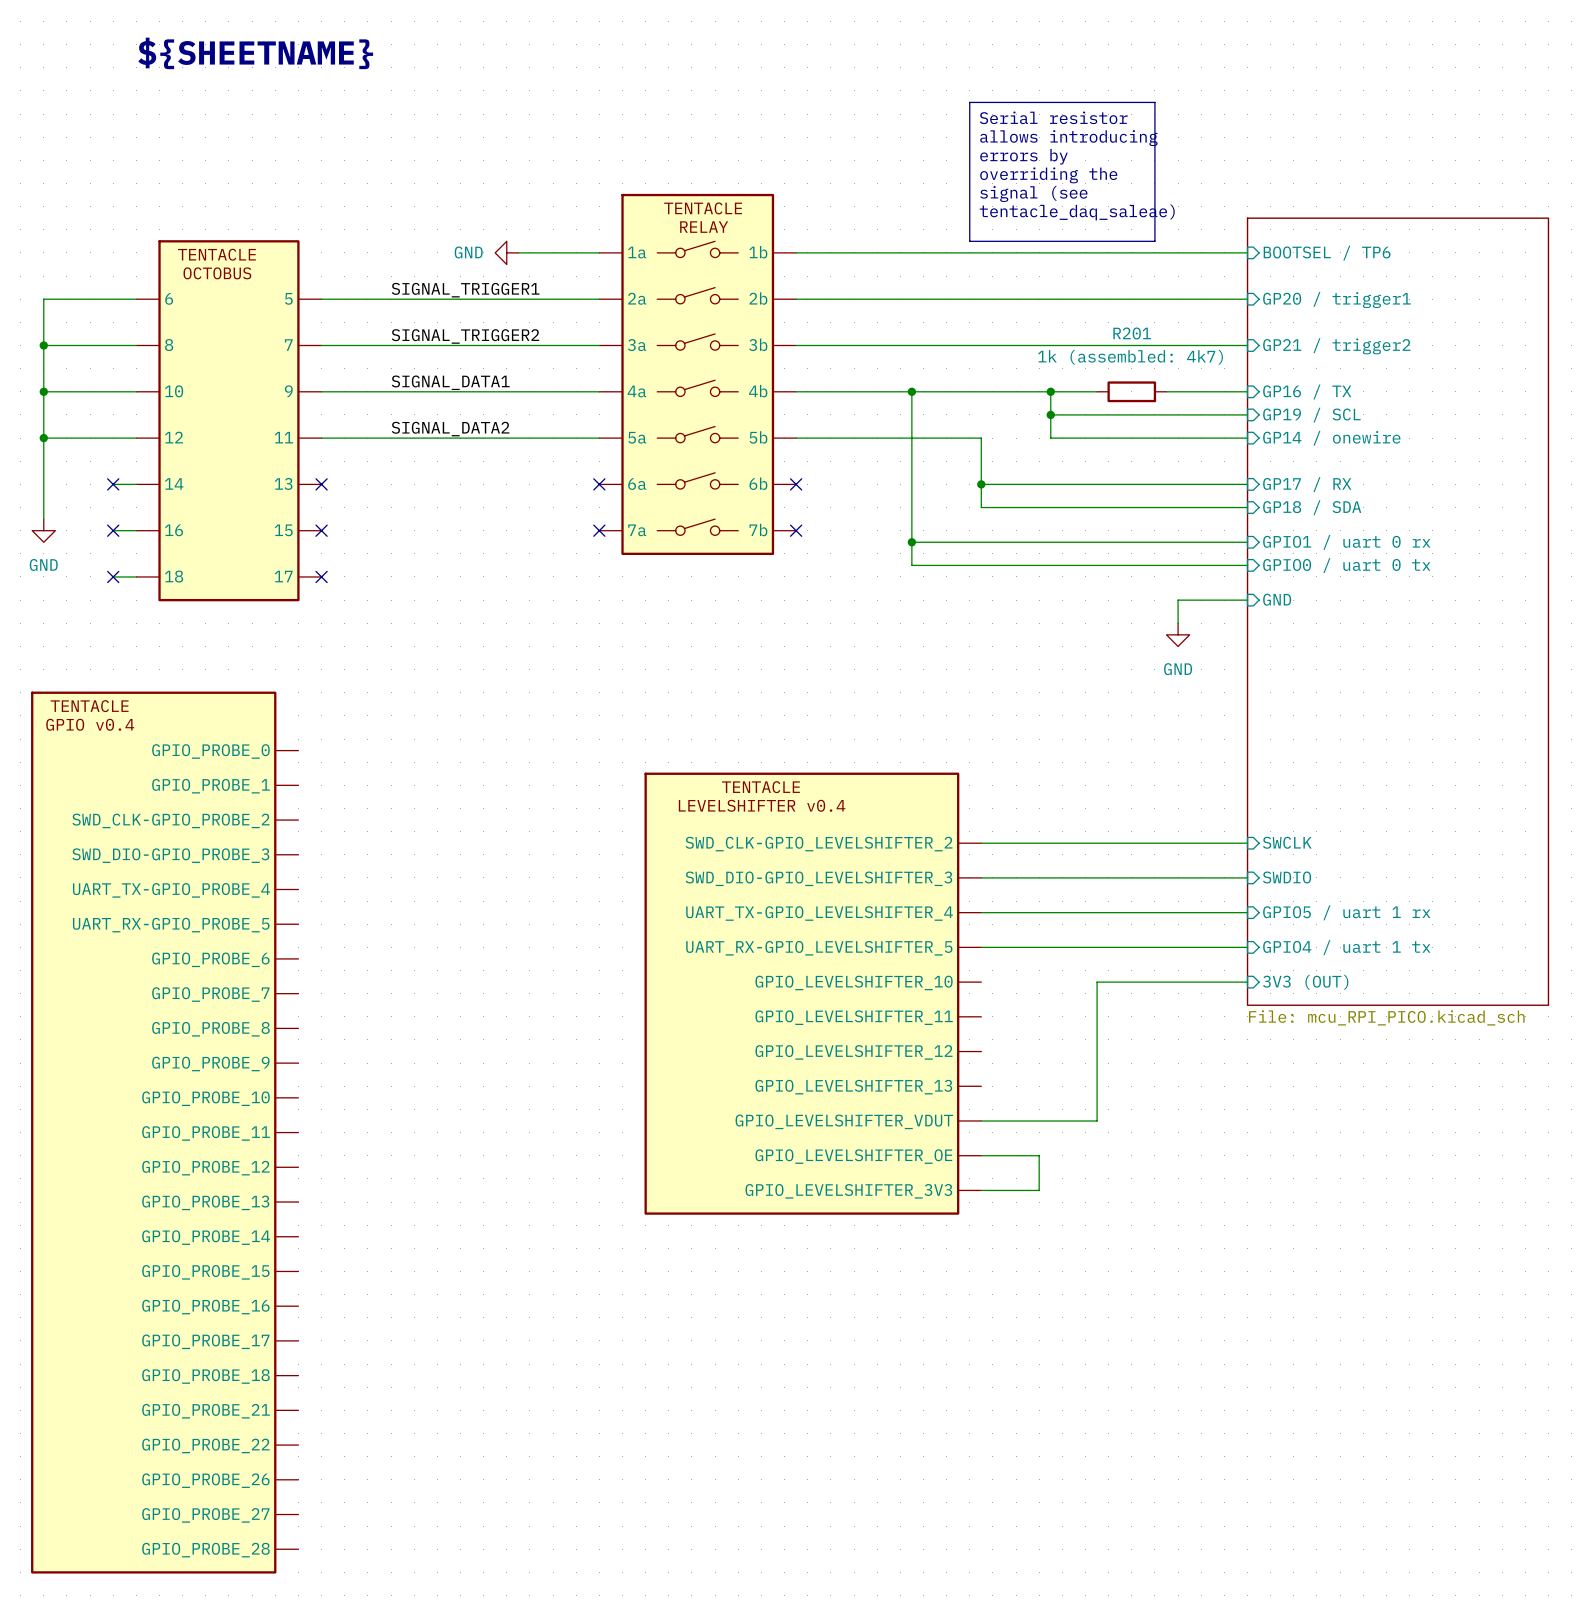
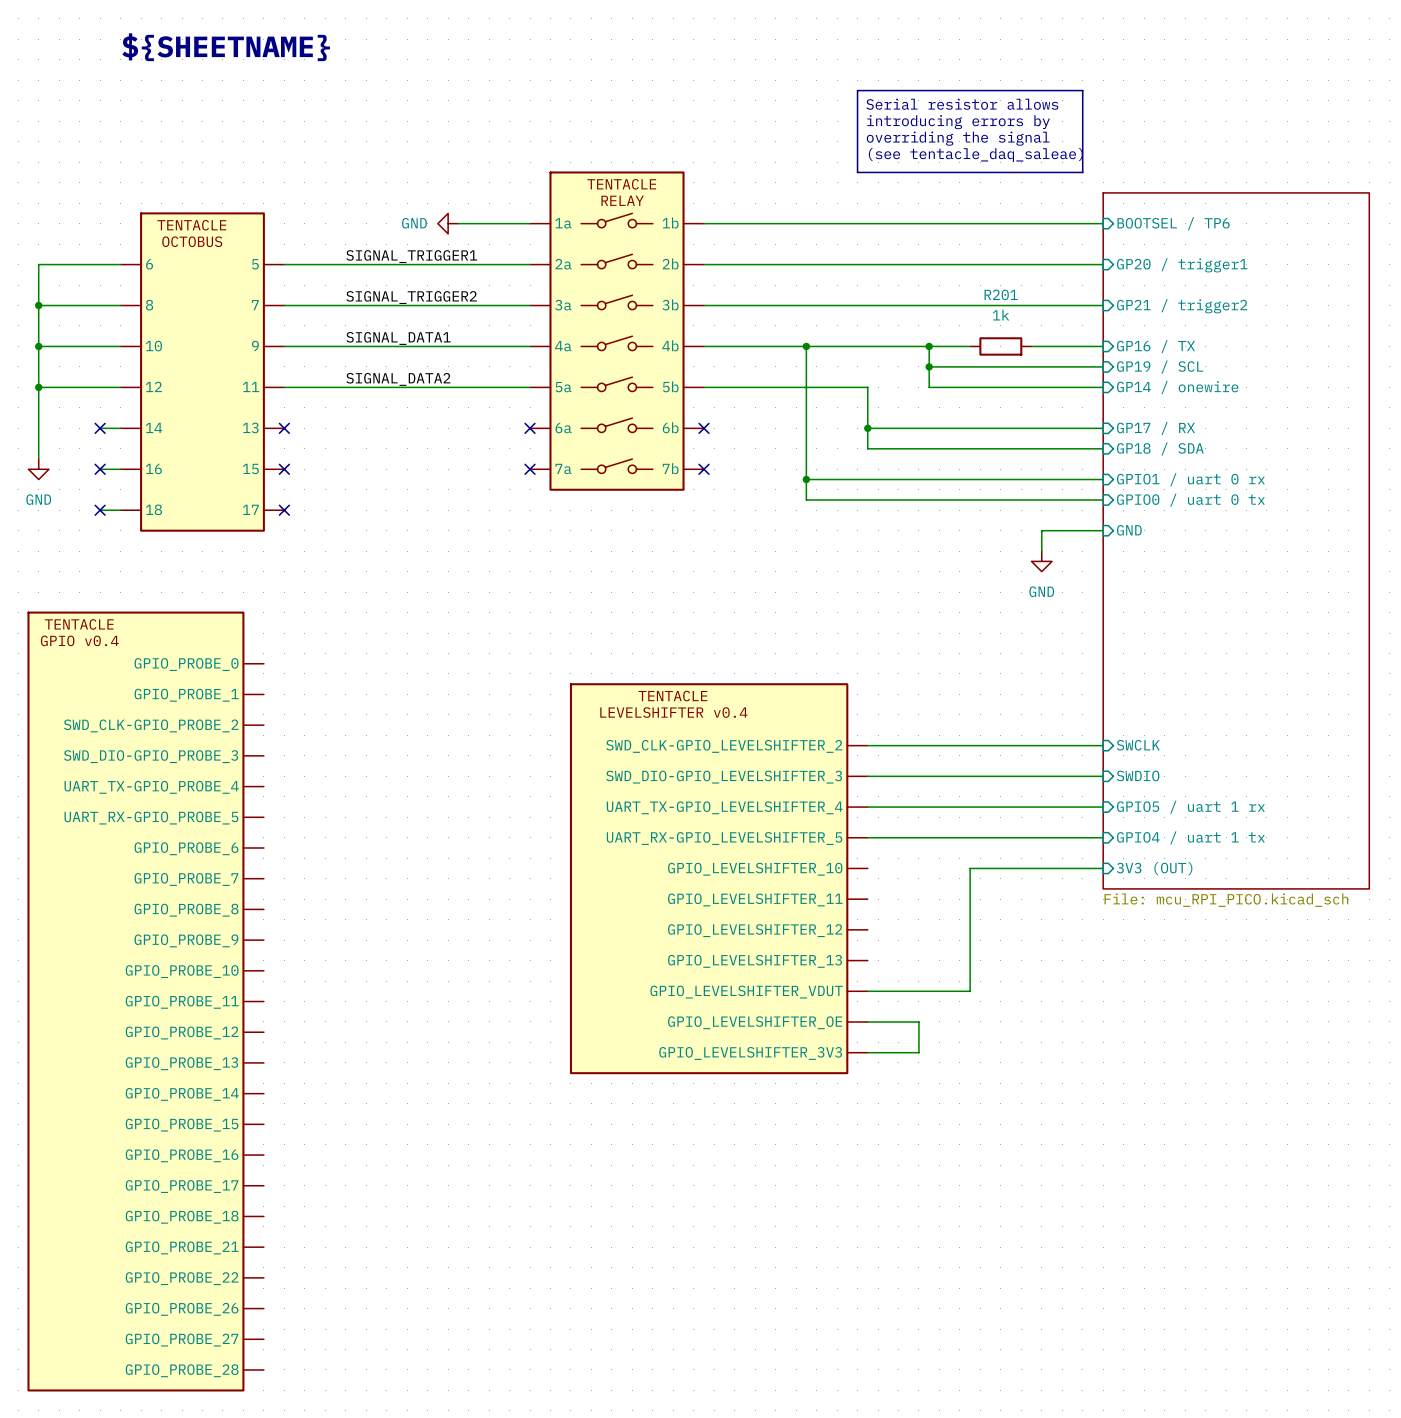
line: (1154, 102) (1154, 241) (969, 241) (969, 195) -> (1021, 90) (1082, 90) (1082, 172) (857, 172)
text: Serial resistor (1053, 117) -> Serial resistor allows (962, 104)
text: allows introducing (1068, 138) -> introducing errors by (958, 122)
text: errors by (1024, 156) -> overriding the signal (958, 138)
text: overriding the (1048, 175) -> (see tentacle_daq_saleae) (975, 154)
text: signal (see (1033, 193) -> none
text: tentacle_daq_saleae) (1077, 212) -> none
R201 value: 1k (assembled: 4k7) (1130, 357) -> 1k (1001, 315)

